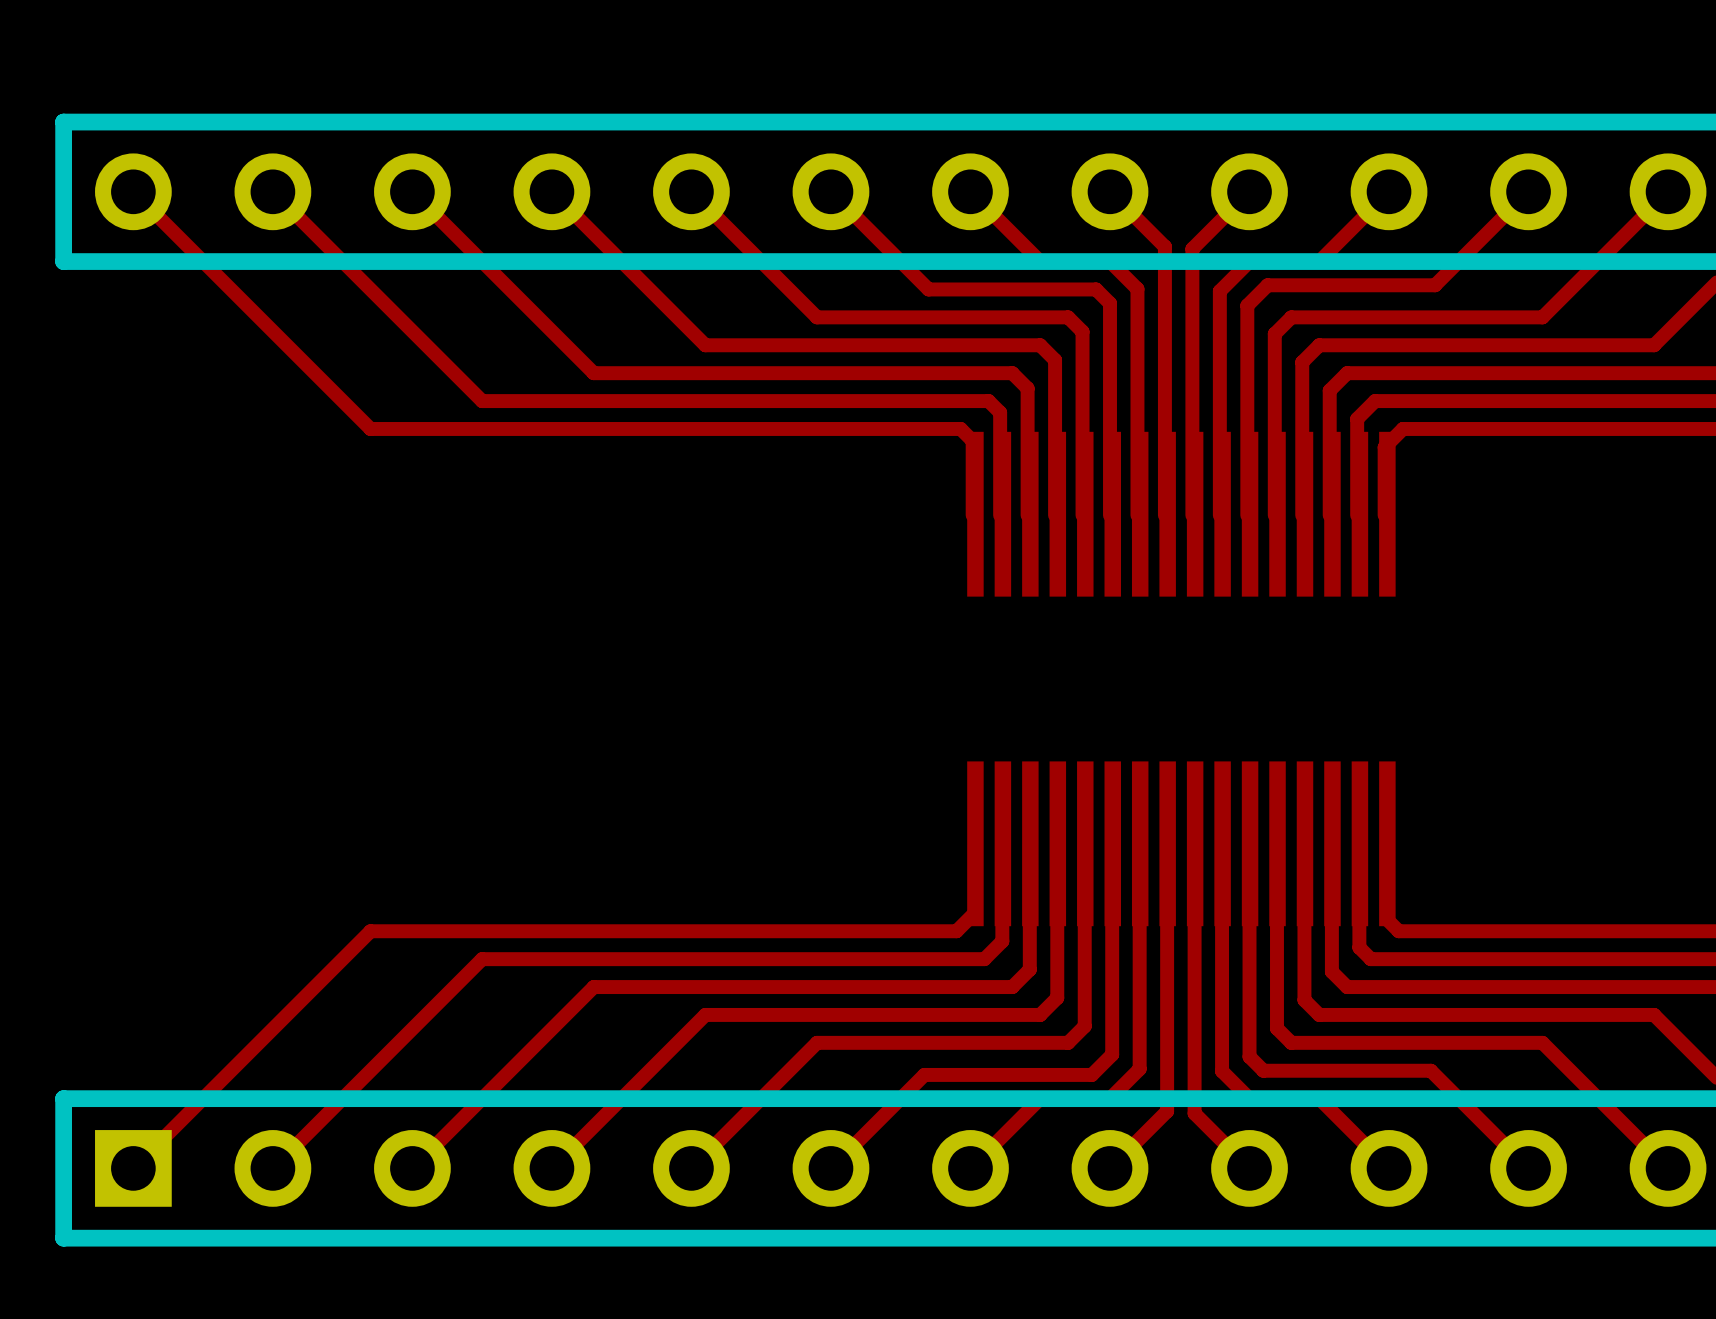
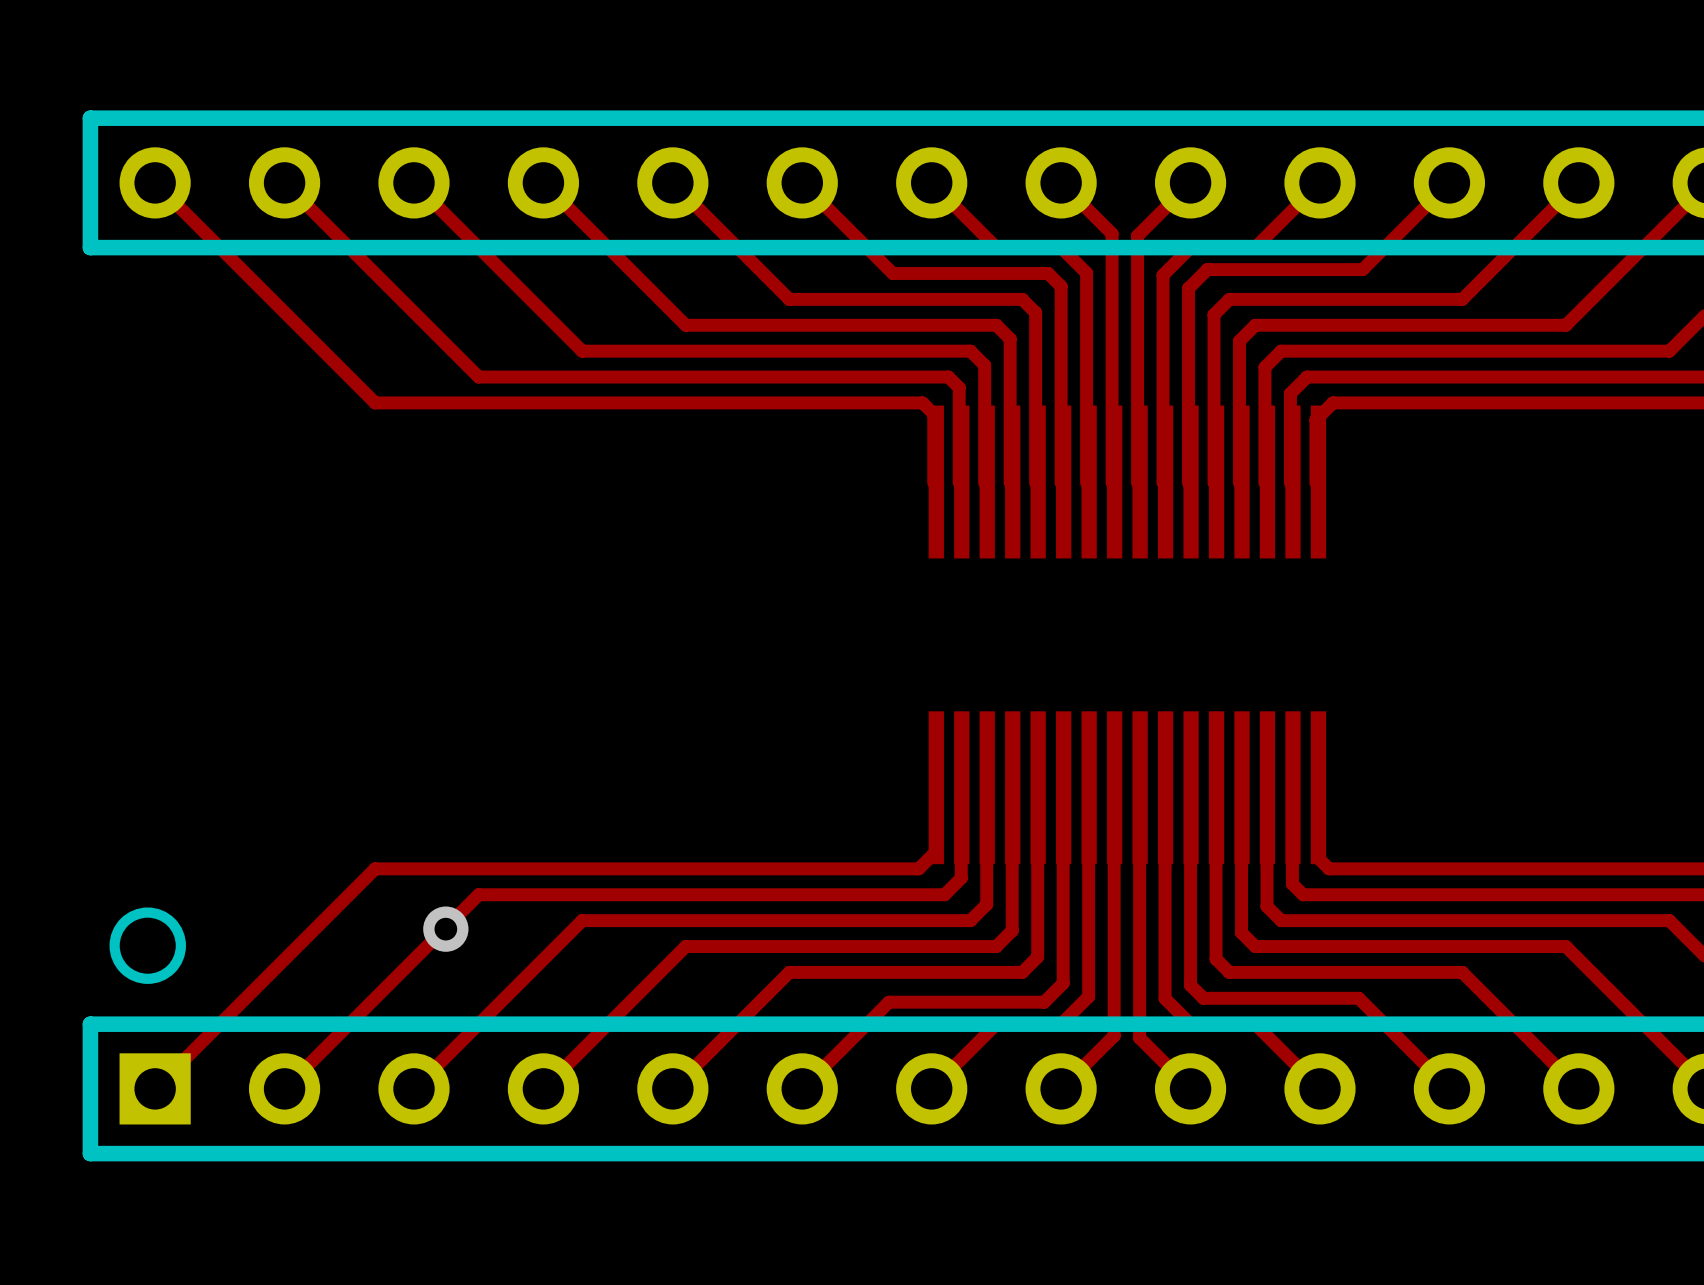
drawing: none -> [109, 907, 186, 984]
via: none -> (445, 929)

